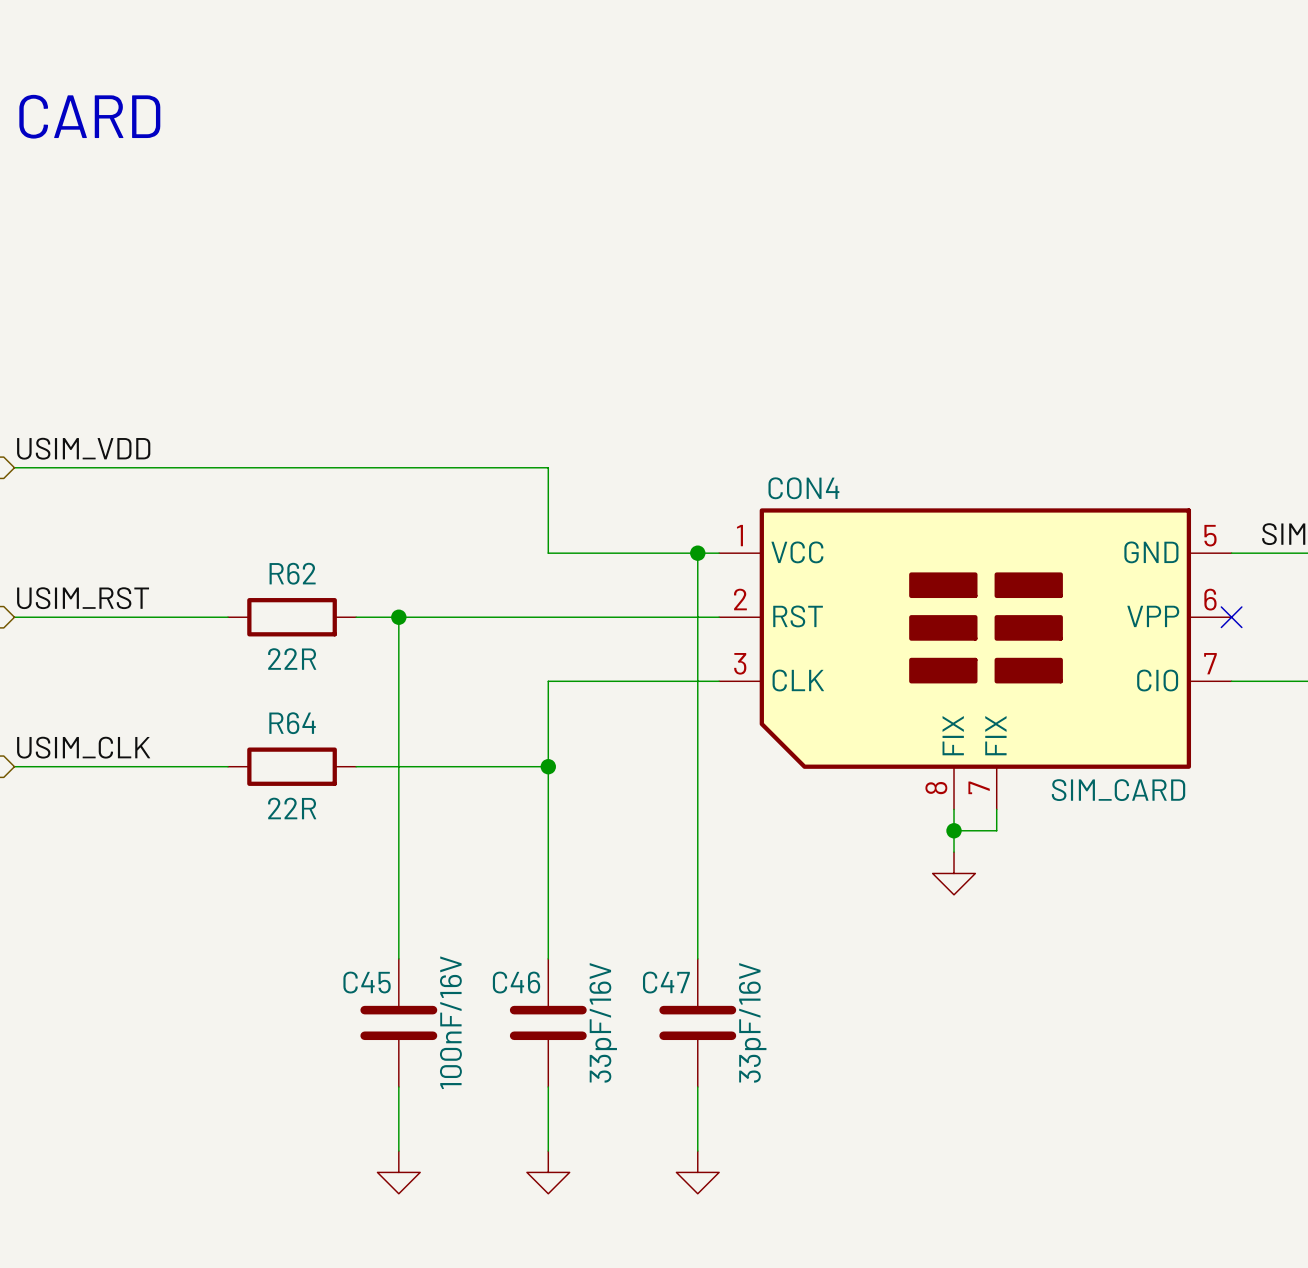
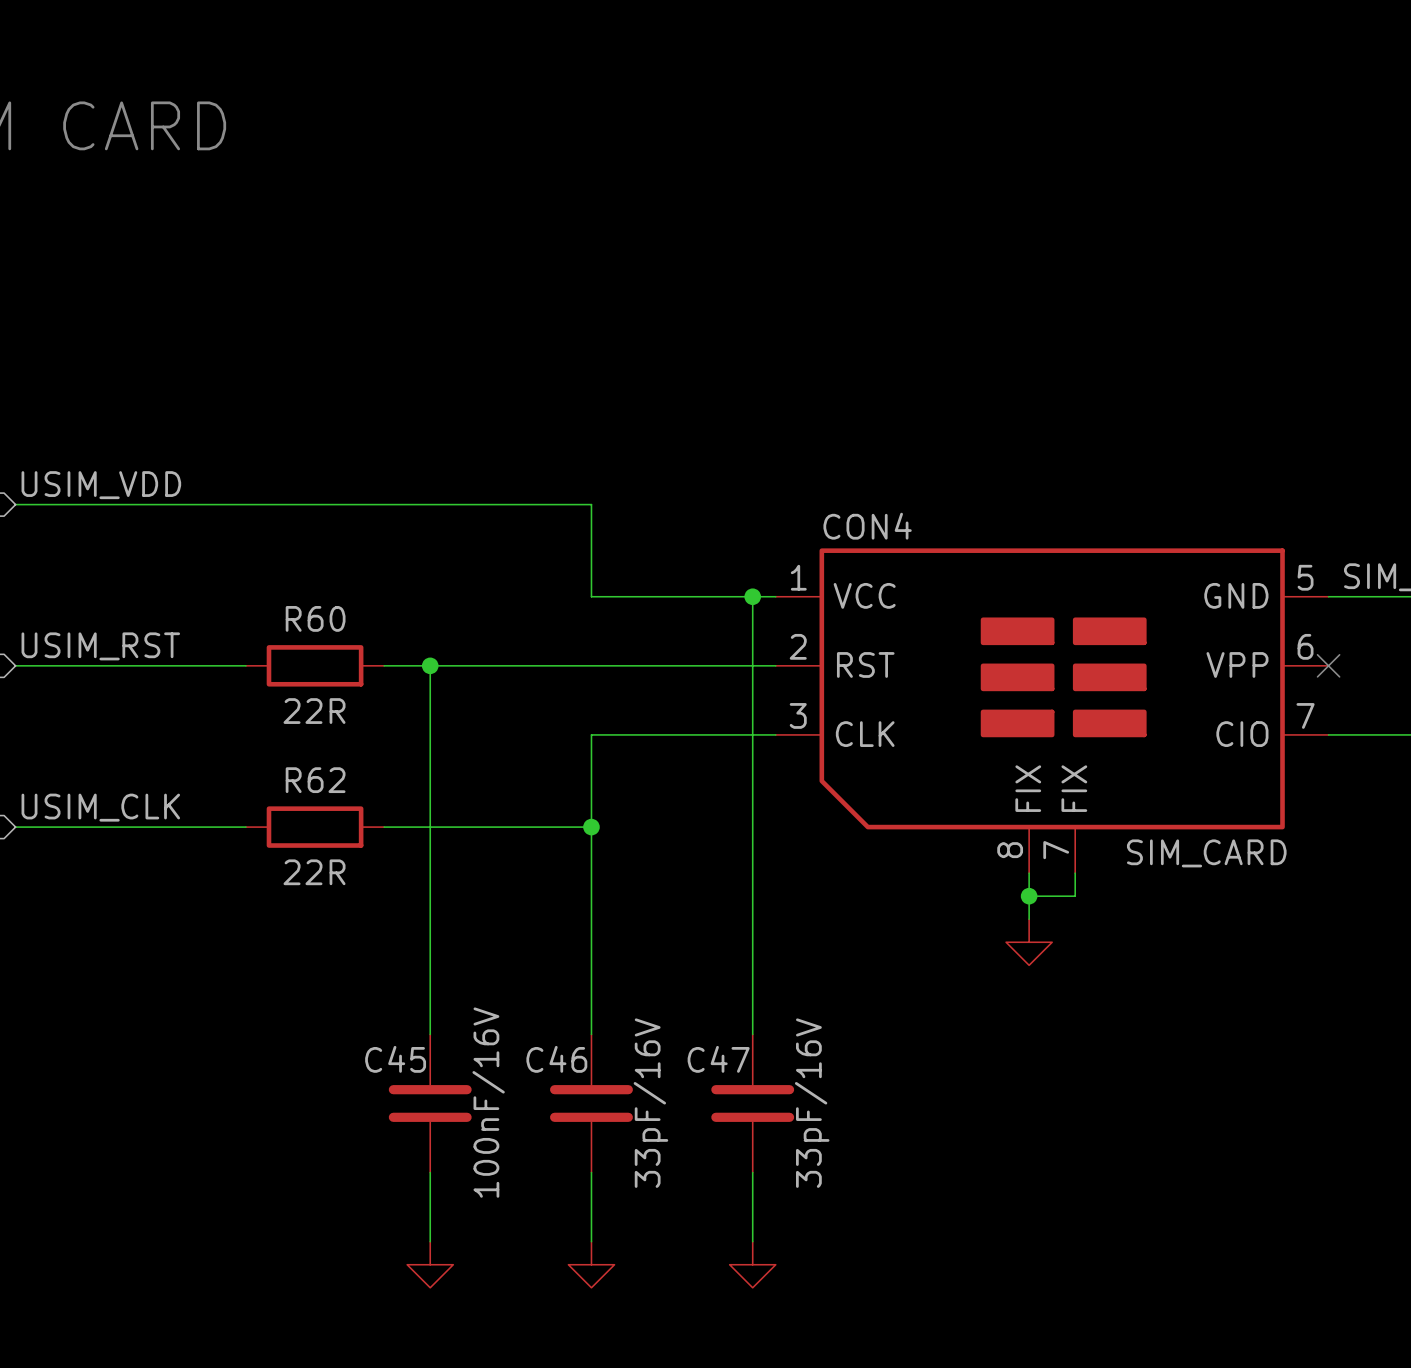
R62 name: R62 (292, 573) -> R60 (315, 618)
R64 name: R64 (292, 723) -> R62 (315, 780)

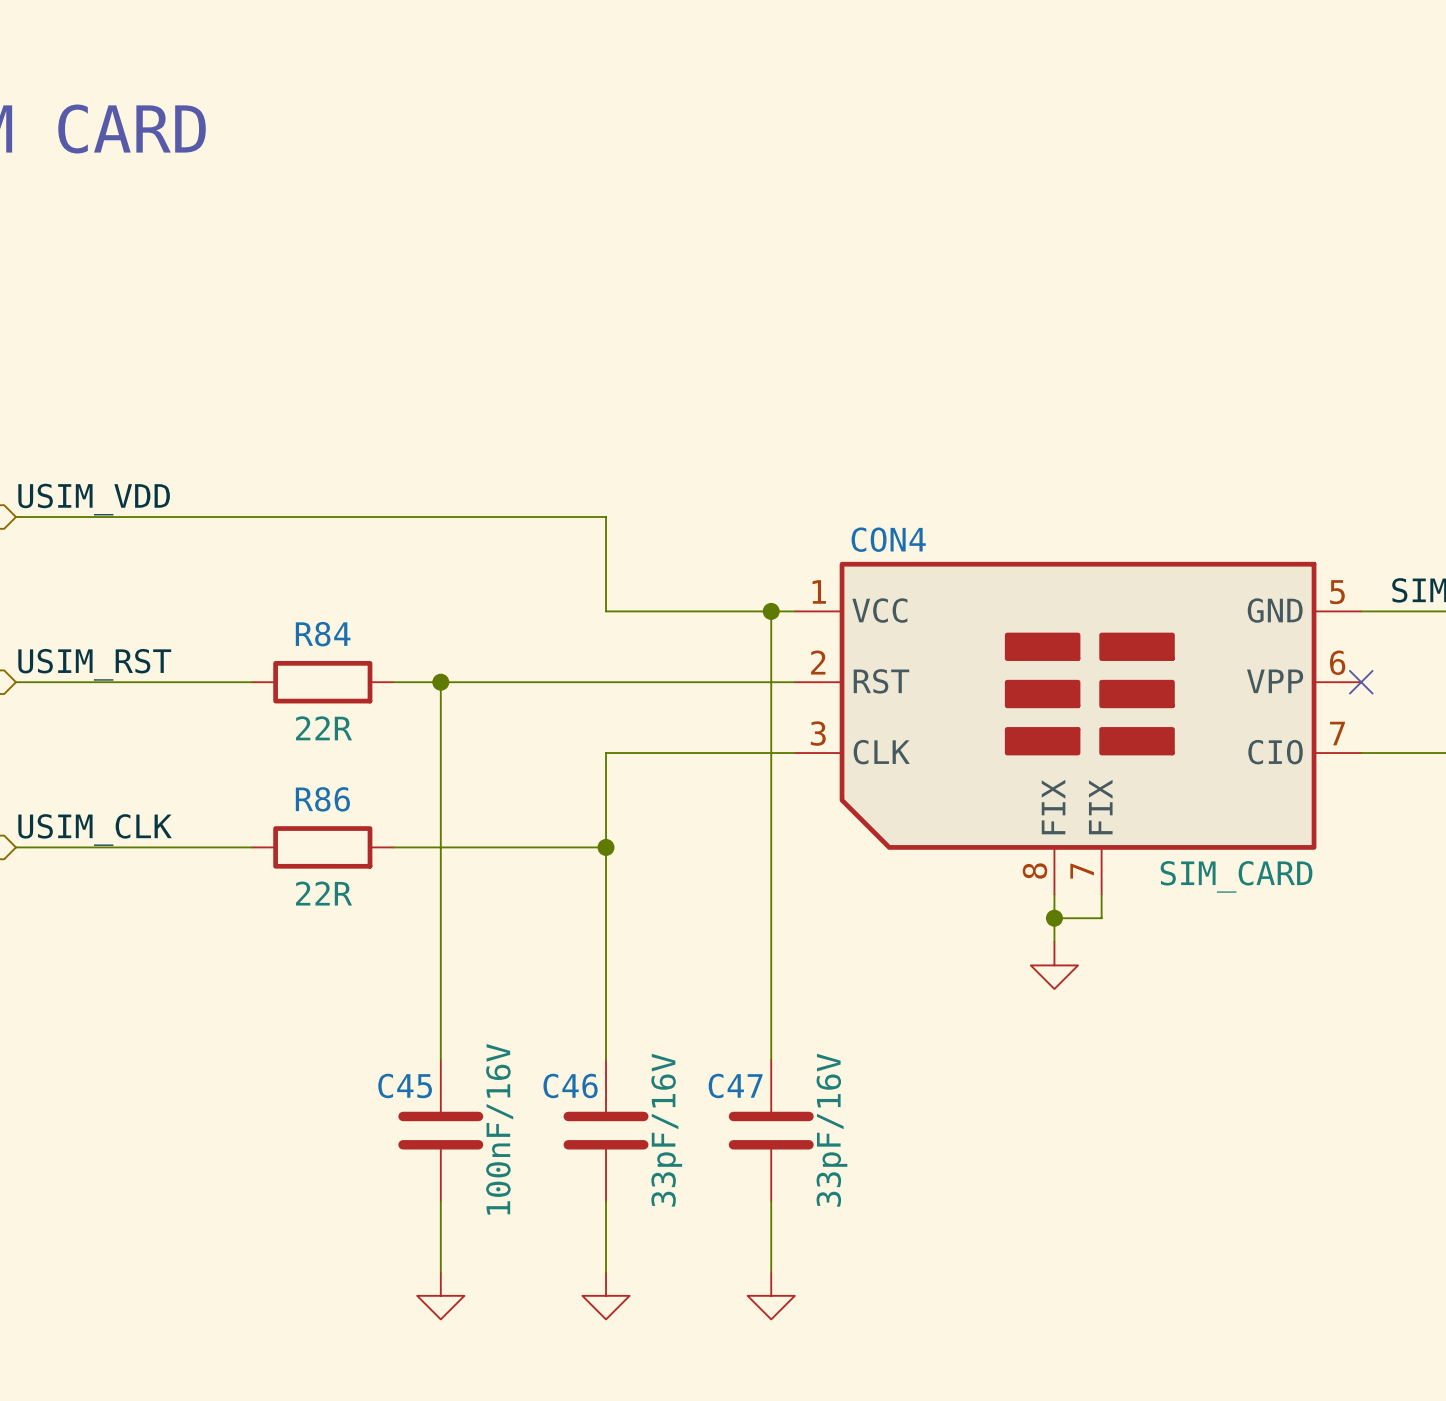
R60 name: R60 (315, 618) -> R84 (323, 634)
R62 name: R62 (315, 780) -> R86 (322, 799)

